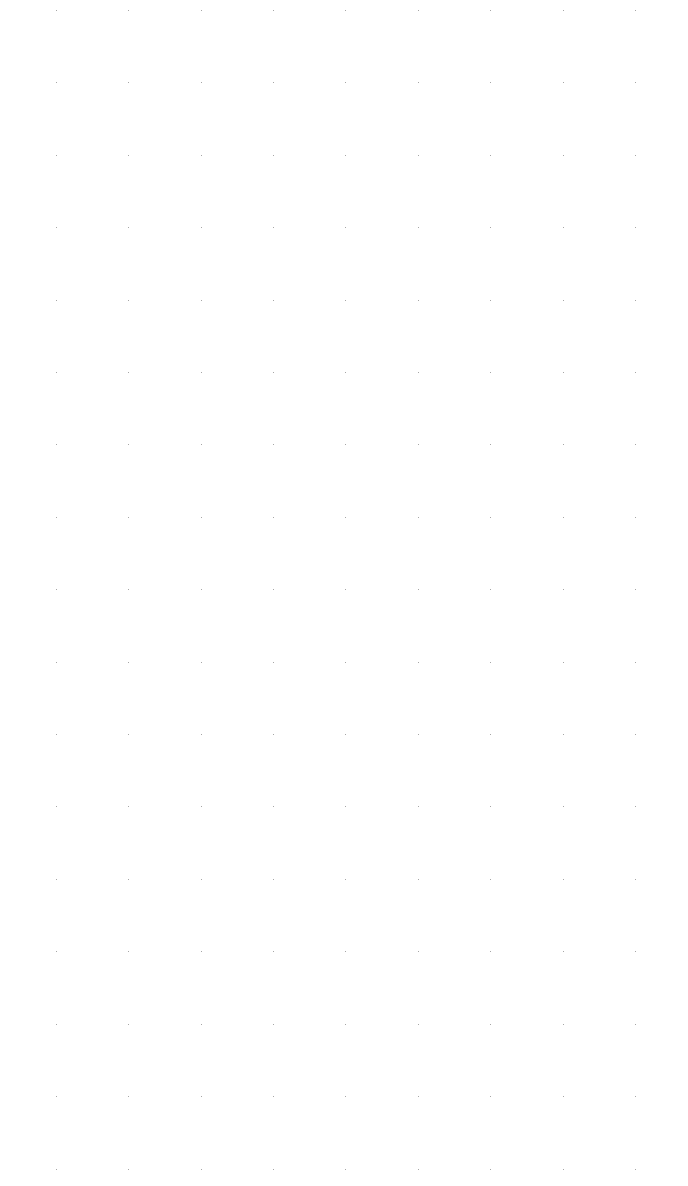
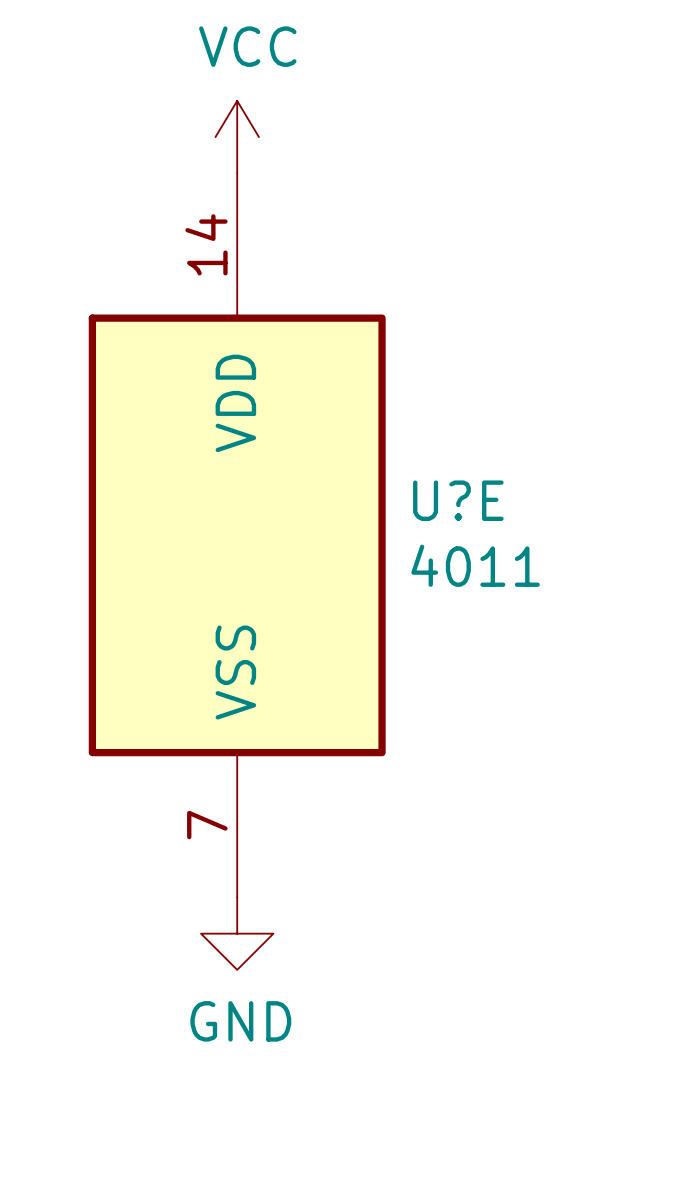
power symbol: none -> VCC (237, 137)
U?E: none -> 4011 (237, 535)
power symbol: none -> GND (237, 933)

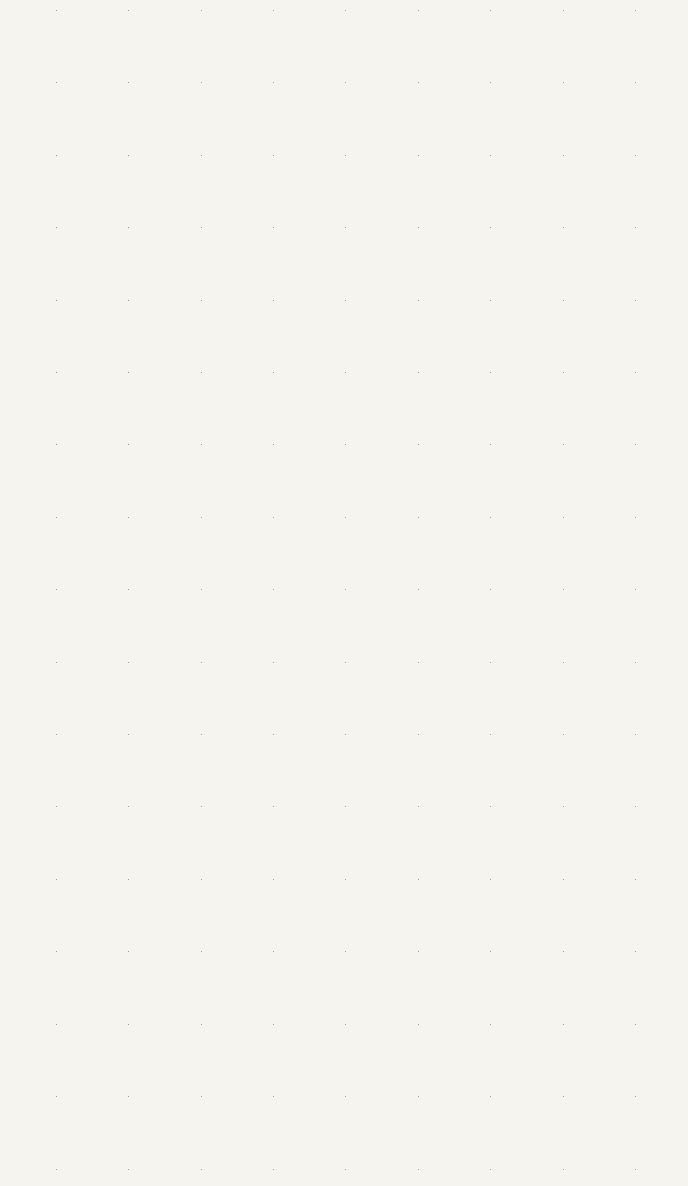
power symbol: VCC (237, 137) -> none
U?E: 4011 (237, 535) -> none
power symbol: GND (237, 933) -> none

